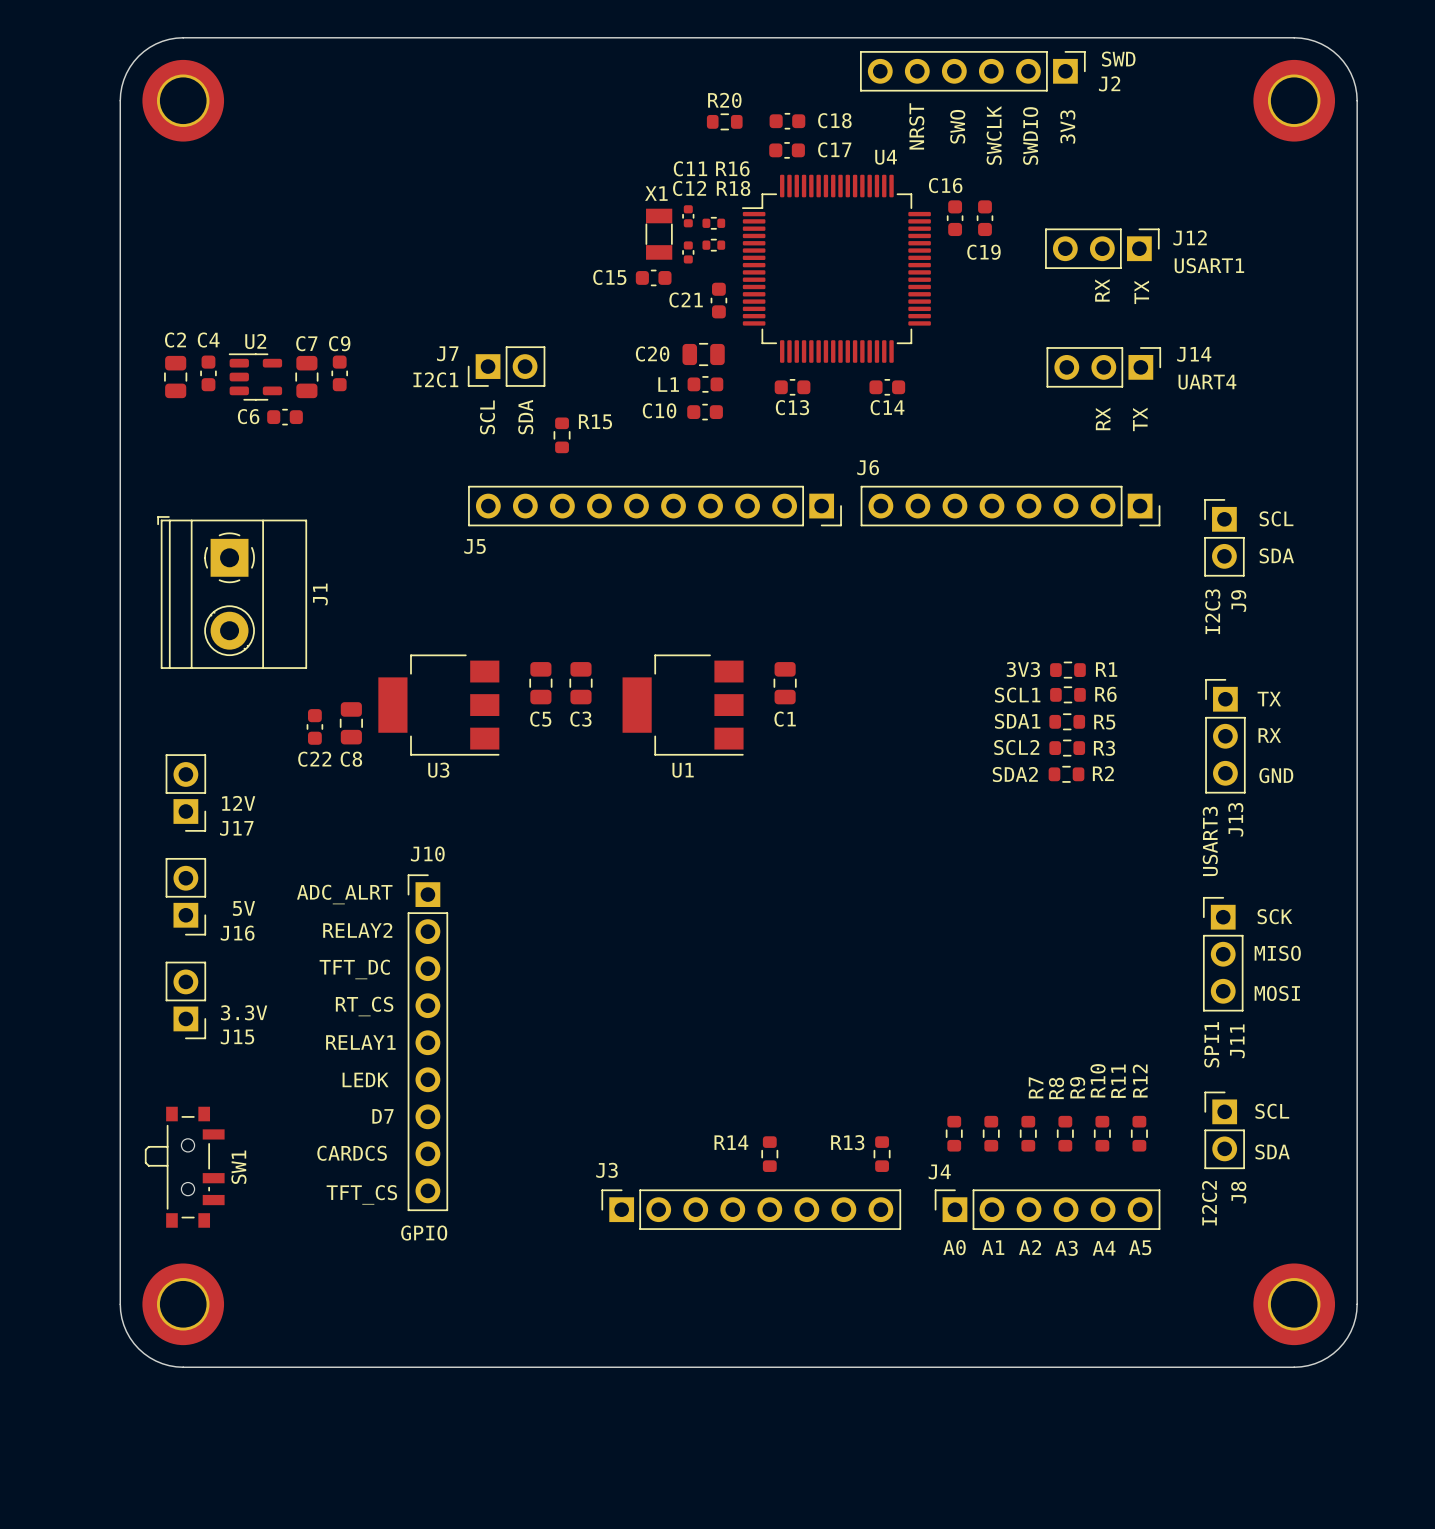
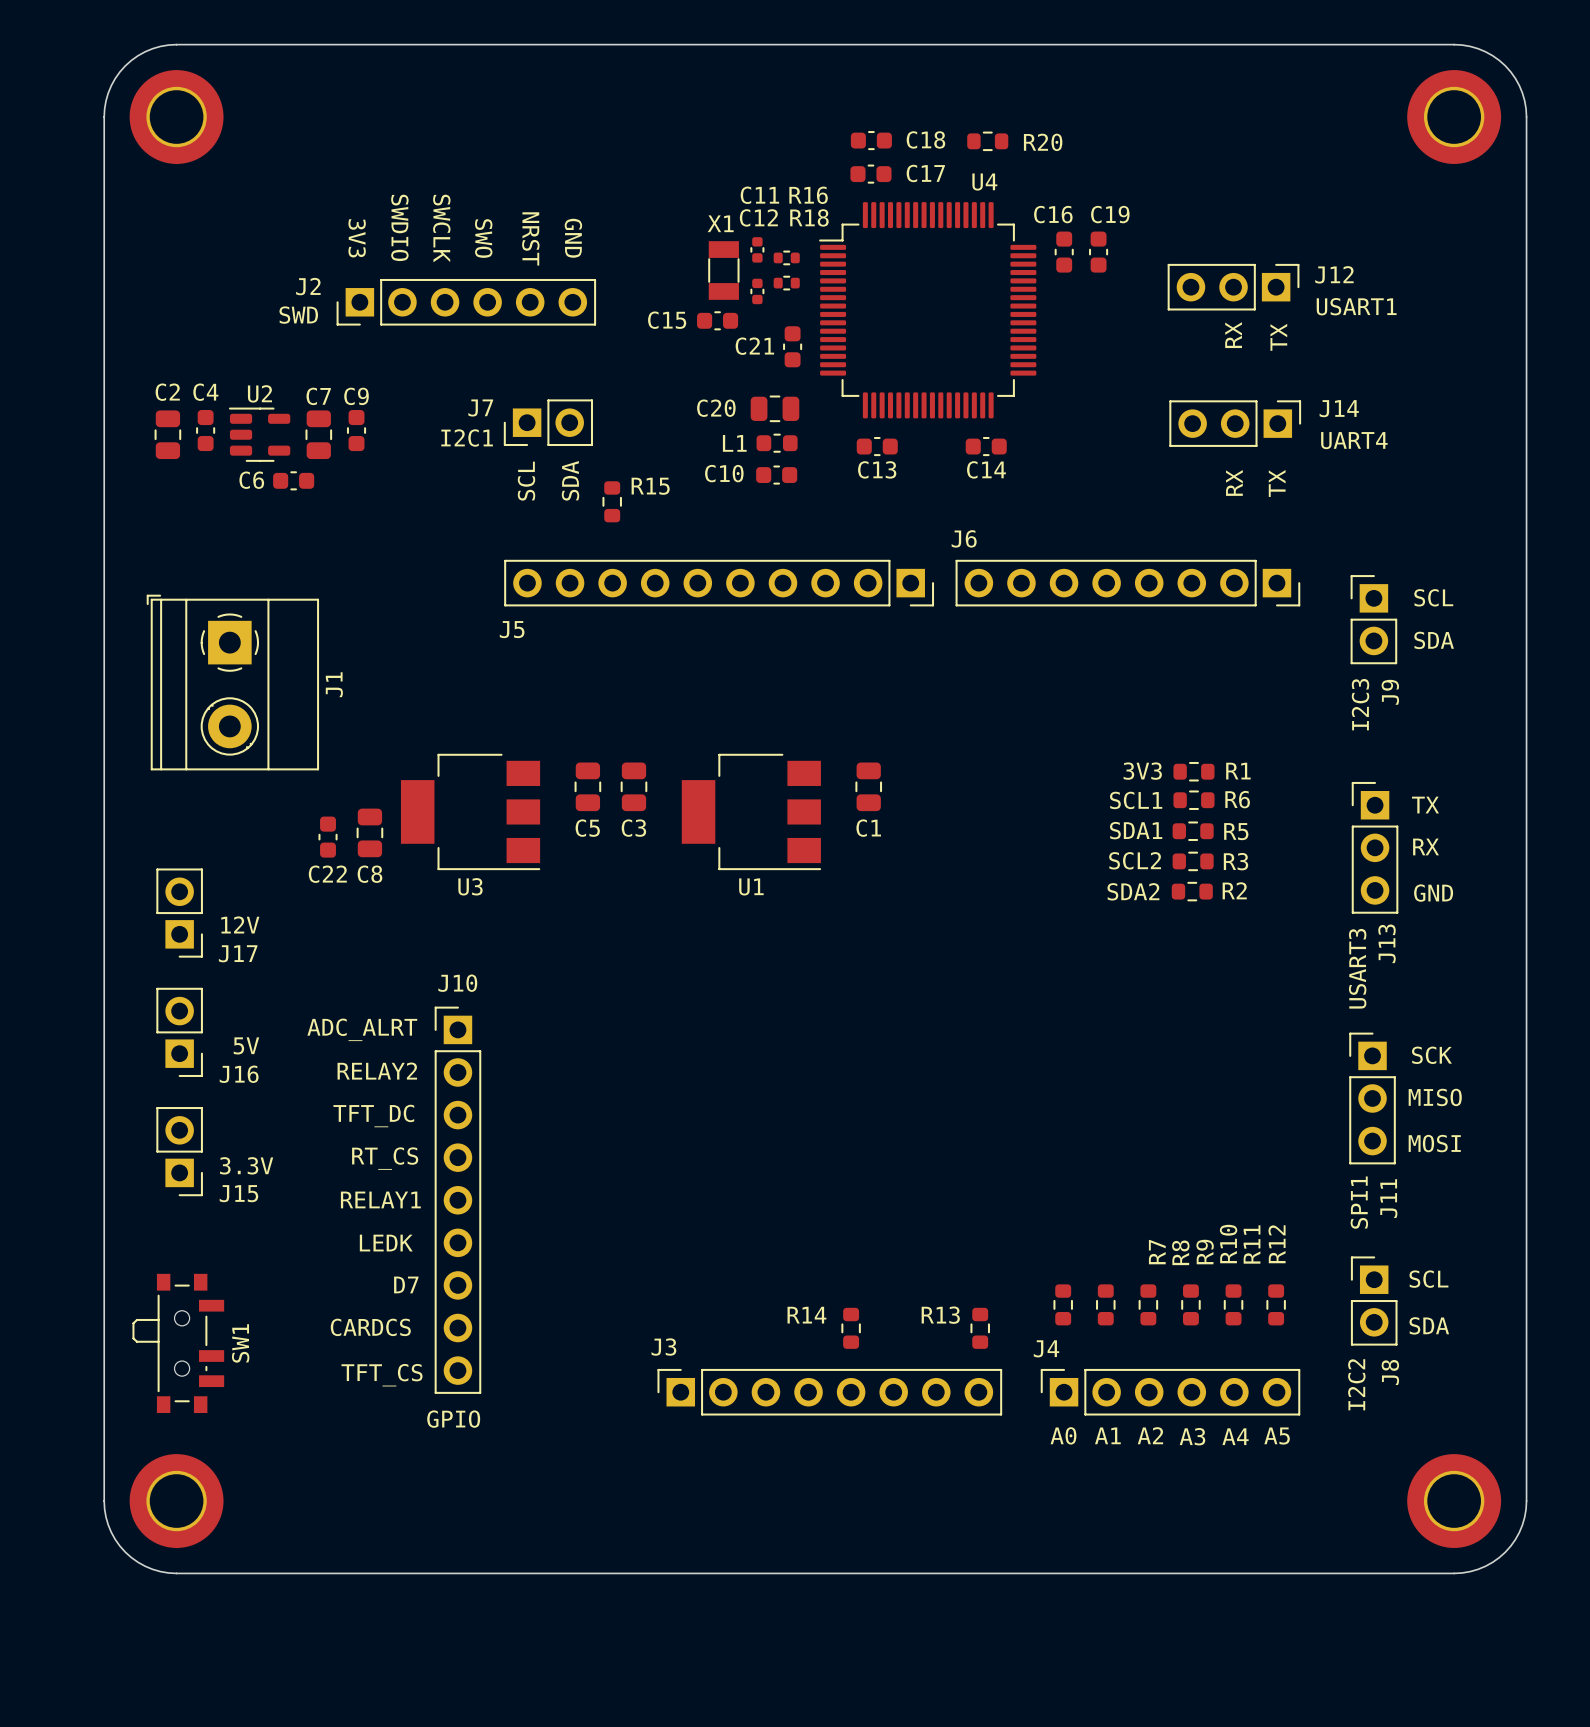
J2 footprint: [860, 51, 1086, 92] -> [336, 278, 597, 326]
J2 value position: SWD (1118, 59) -> SWD (298, 315)
J2 name position: J2 (1109, 83) -> J2 (308, 286)
R20 name position: R20 (724, 100) -> R20 (1043, 142)
R20 position: (724, 121) -> (987, 141)
C19 name position: C19 (983, 252) -> C19 (1110, 214)

